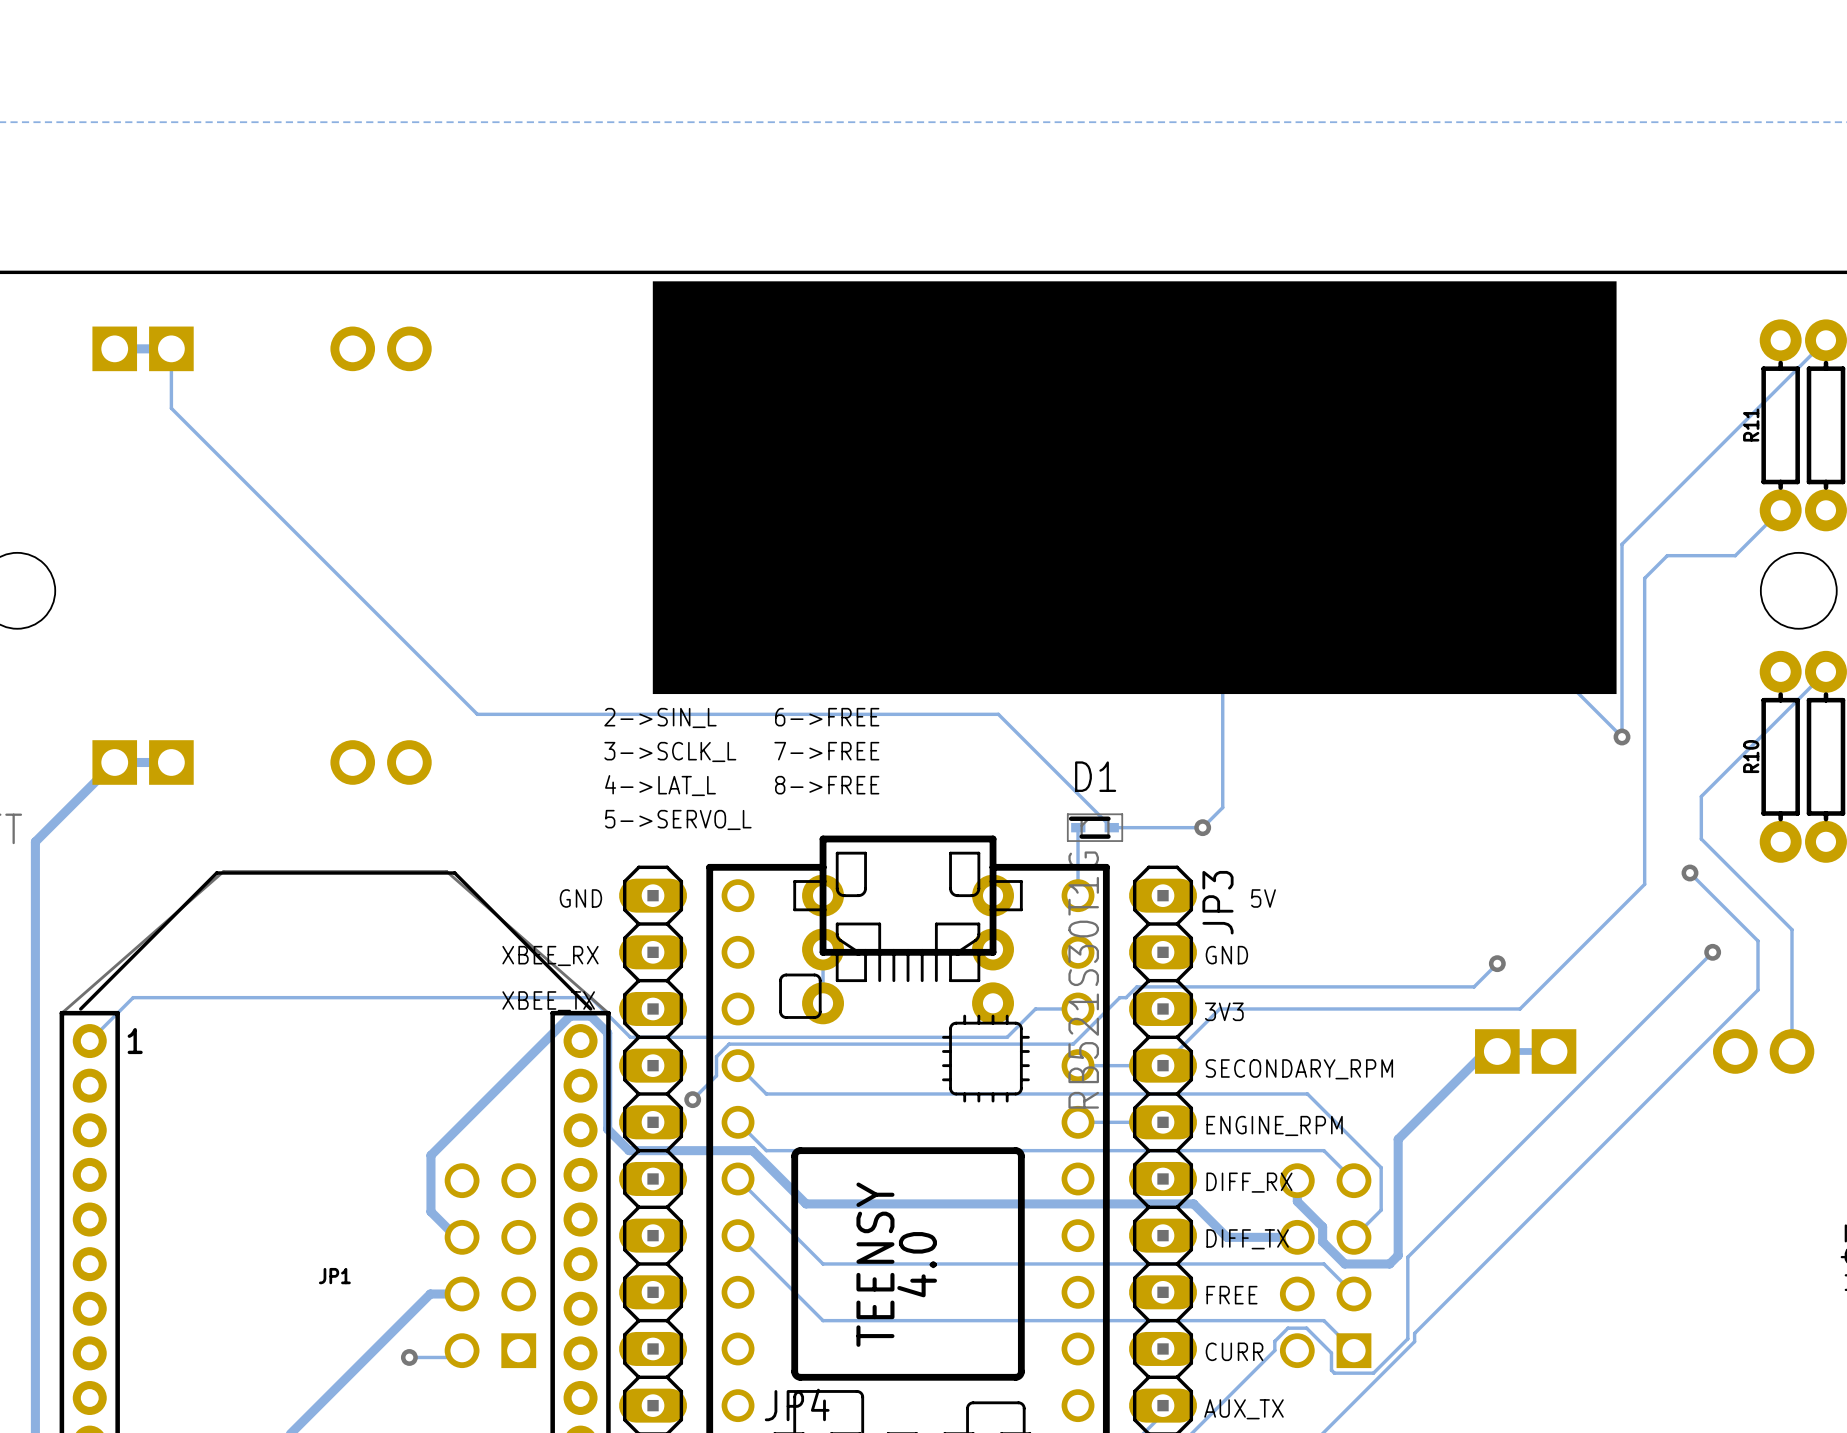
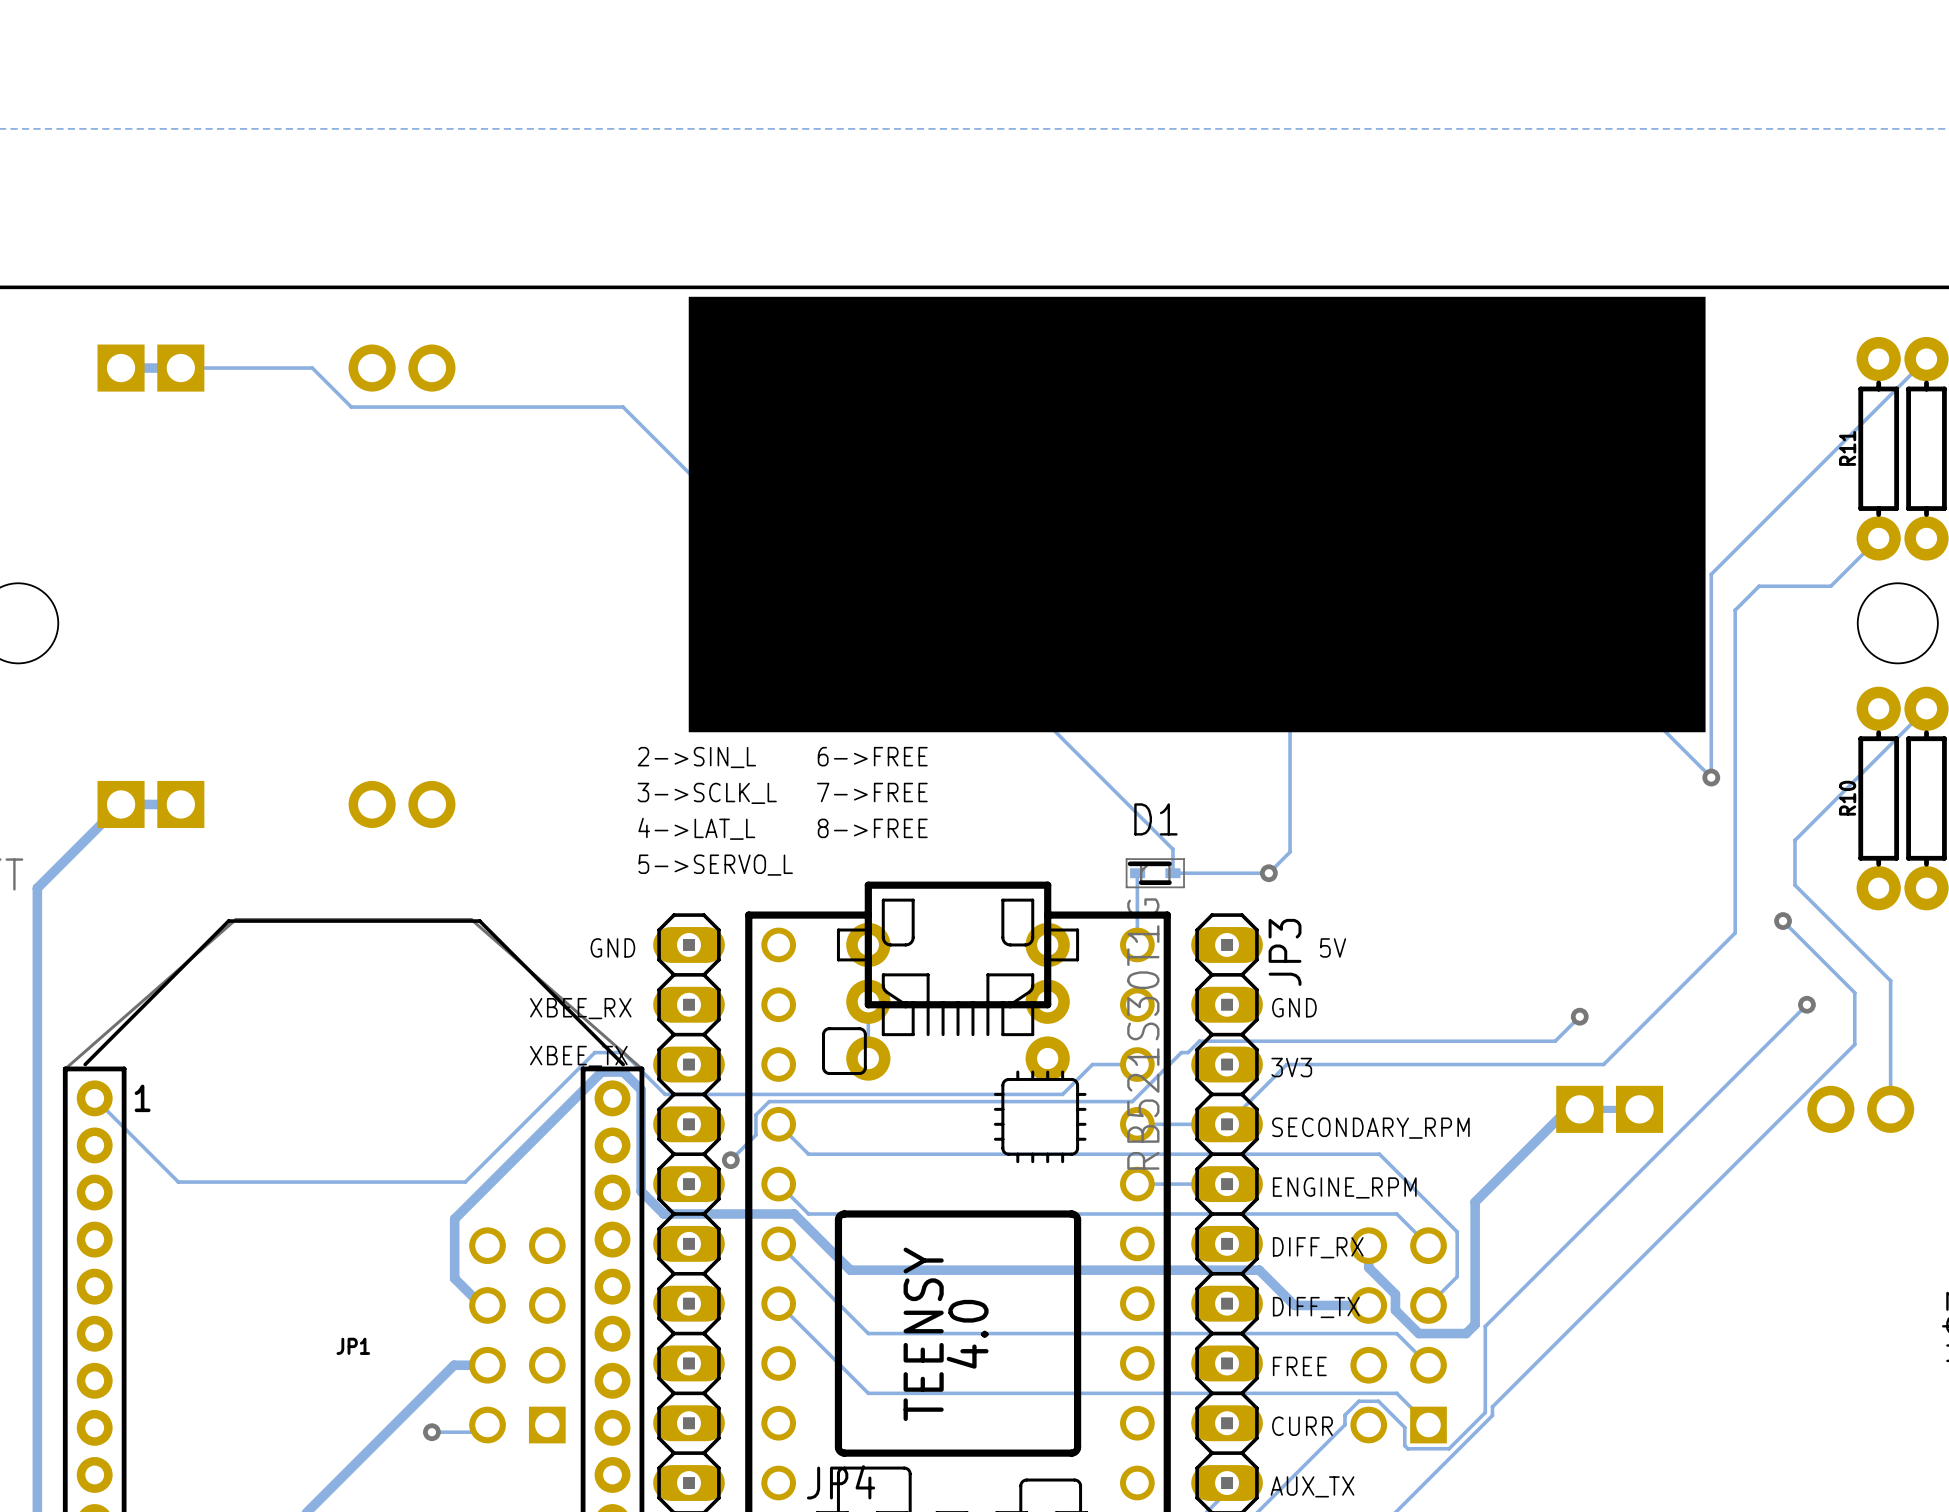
track: (171, 348) (171, 408) (477, 714) (998, 714) (1111, 827) -> (180, 368) (312, 368) (351, 407) (623, 407) (814, 598) (921, 598) (1172, 849) (1172, 873)
track: (563, 997) (133, 997) (89, 1041) -> (594, 1052) (465, 1182) (178, 1182) (94, 1098)

